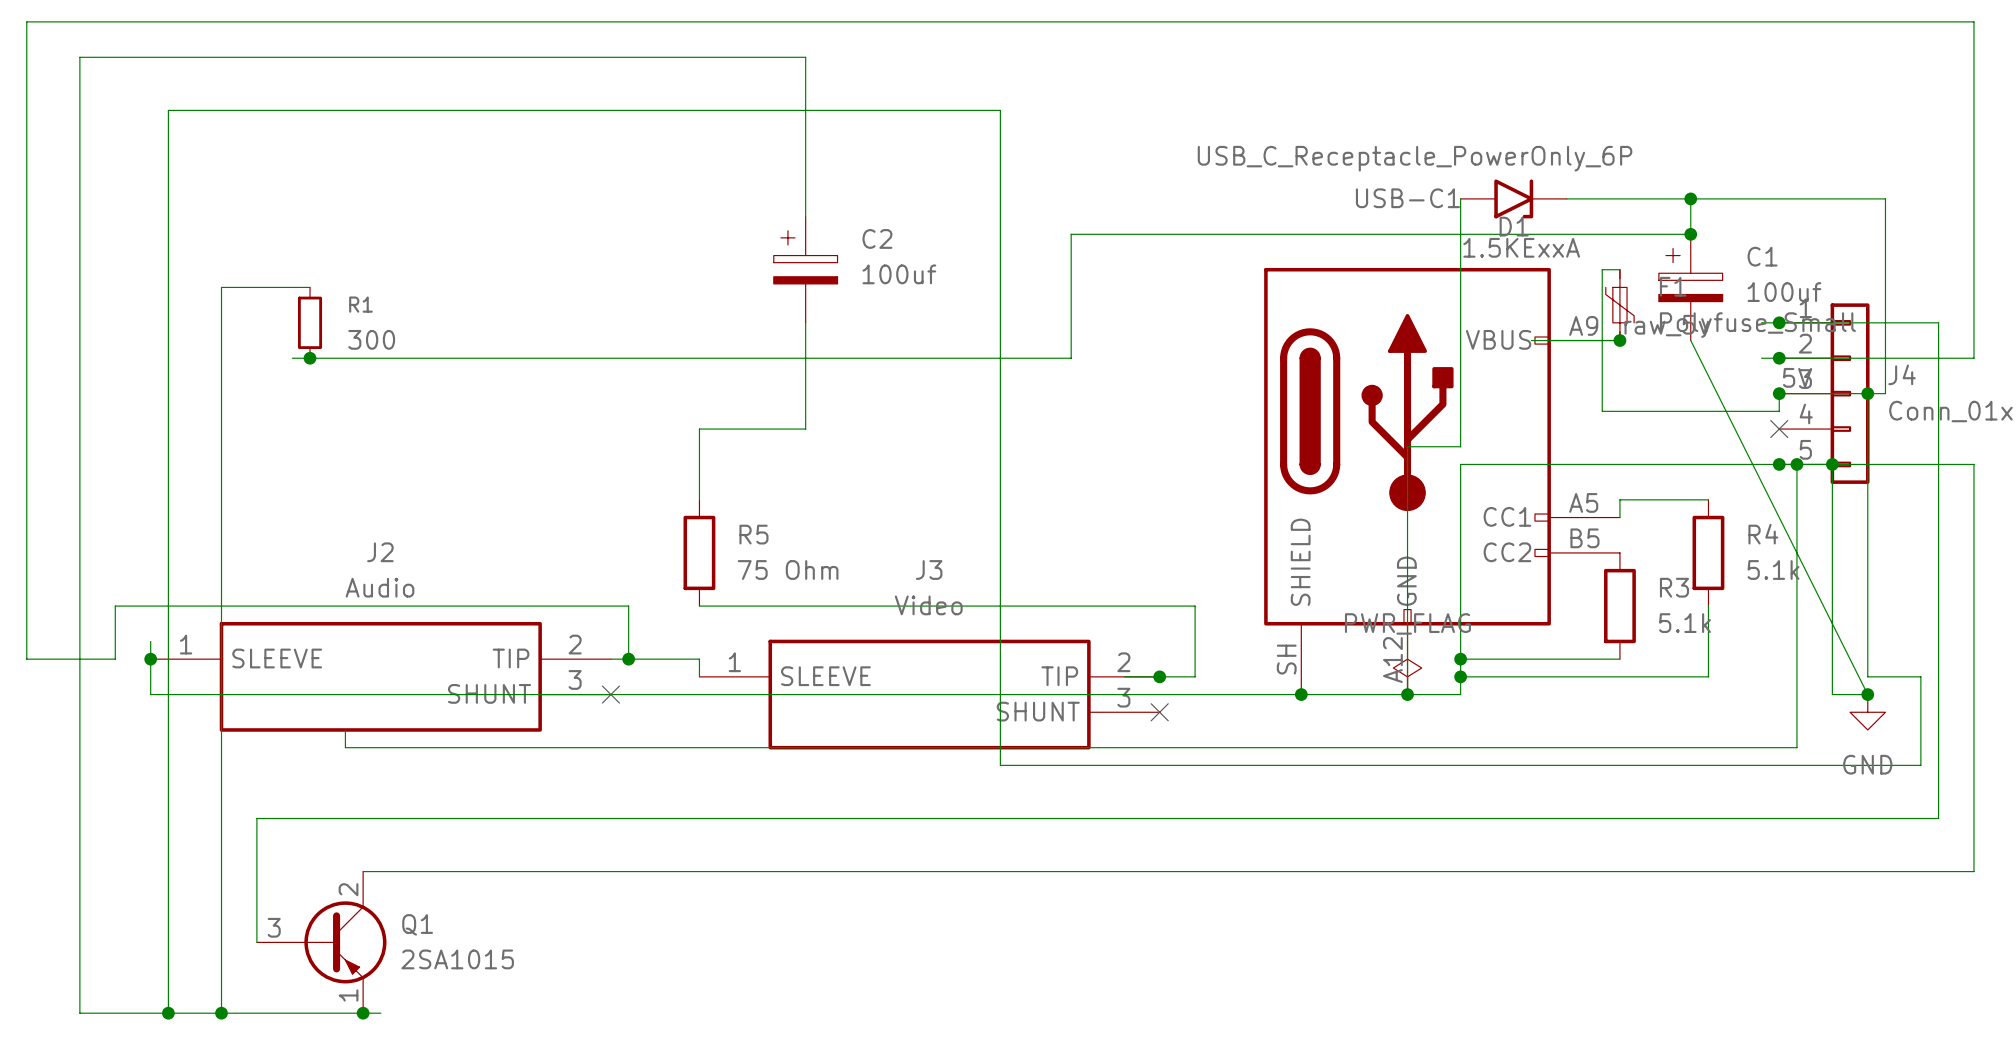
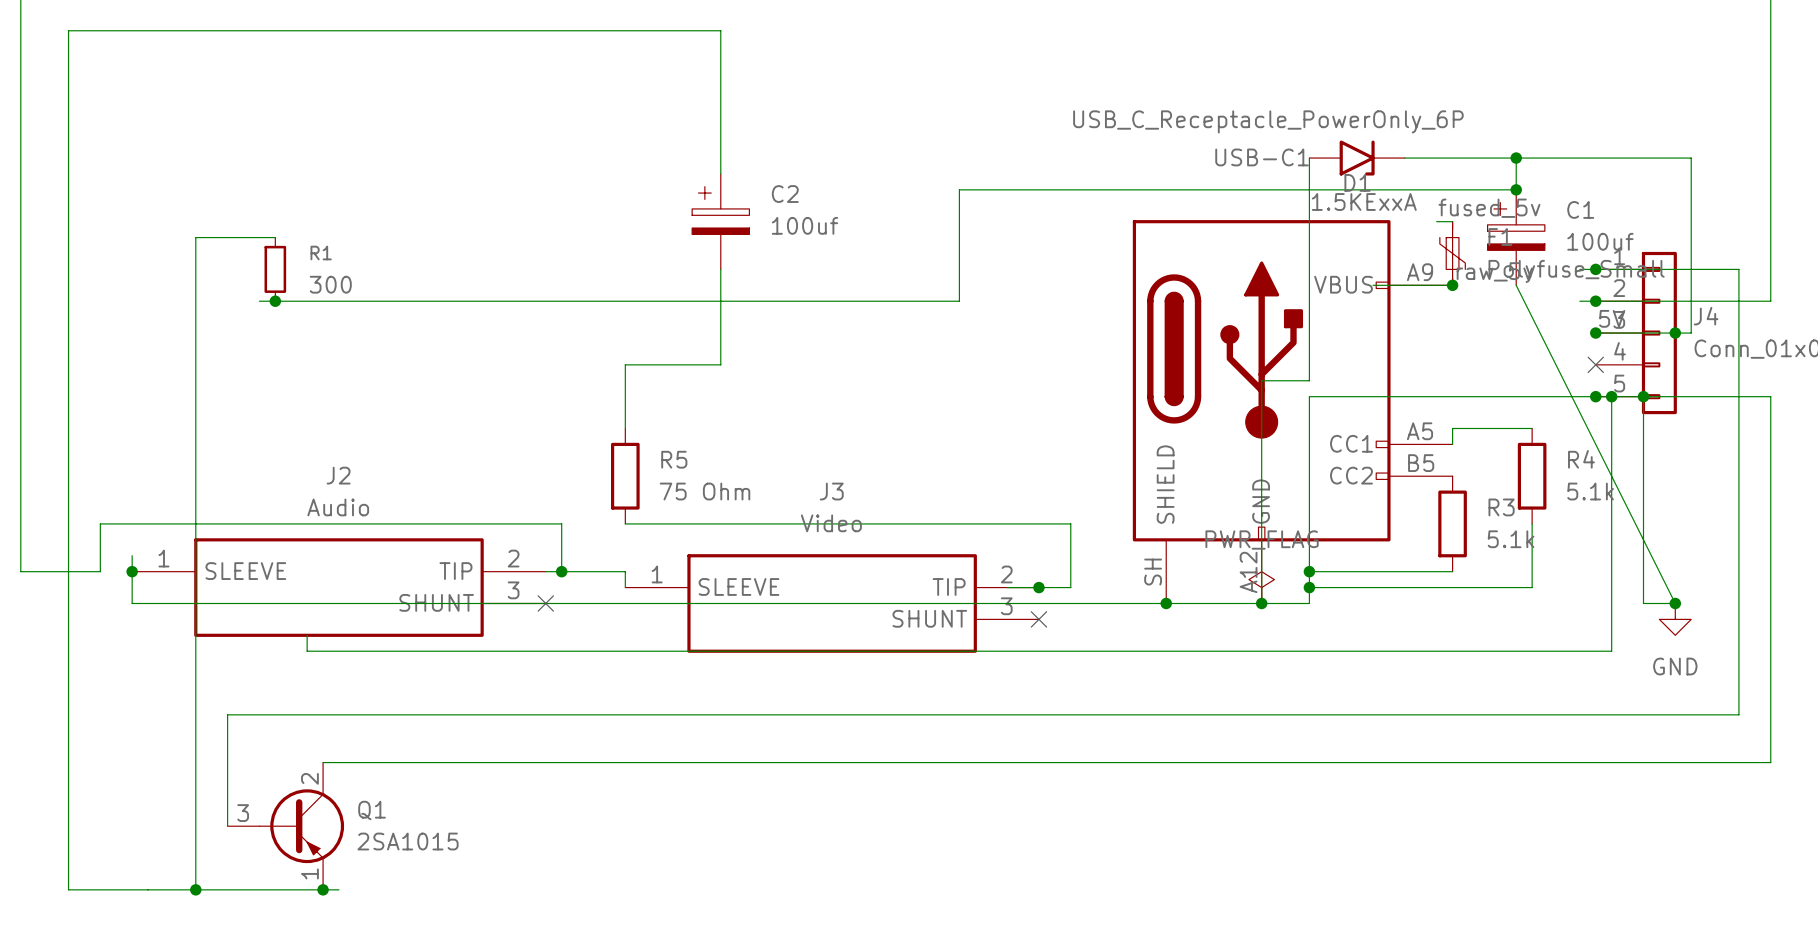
label: none -> fused_5v (1489, 208)
wire: (1602, 269) (1602, 411) (1779, 411) (1779, 393) -> none
wire: (1867, 393) (1867, 676) (1920, 676) (1920, 765) (1000, 765) (1000, 110) (168, 110) (168, 1013) -> none
junction: (168, 1013) -> none

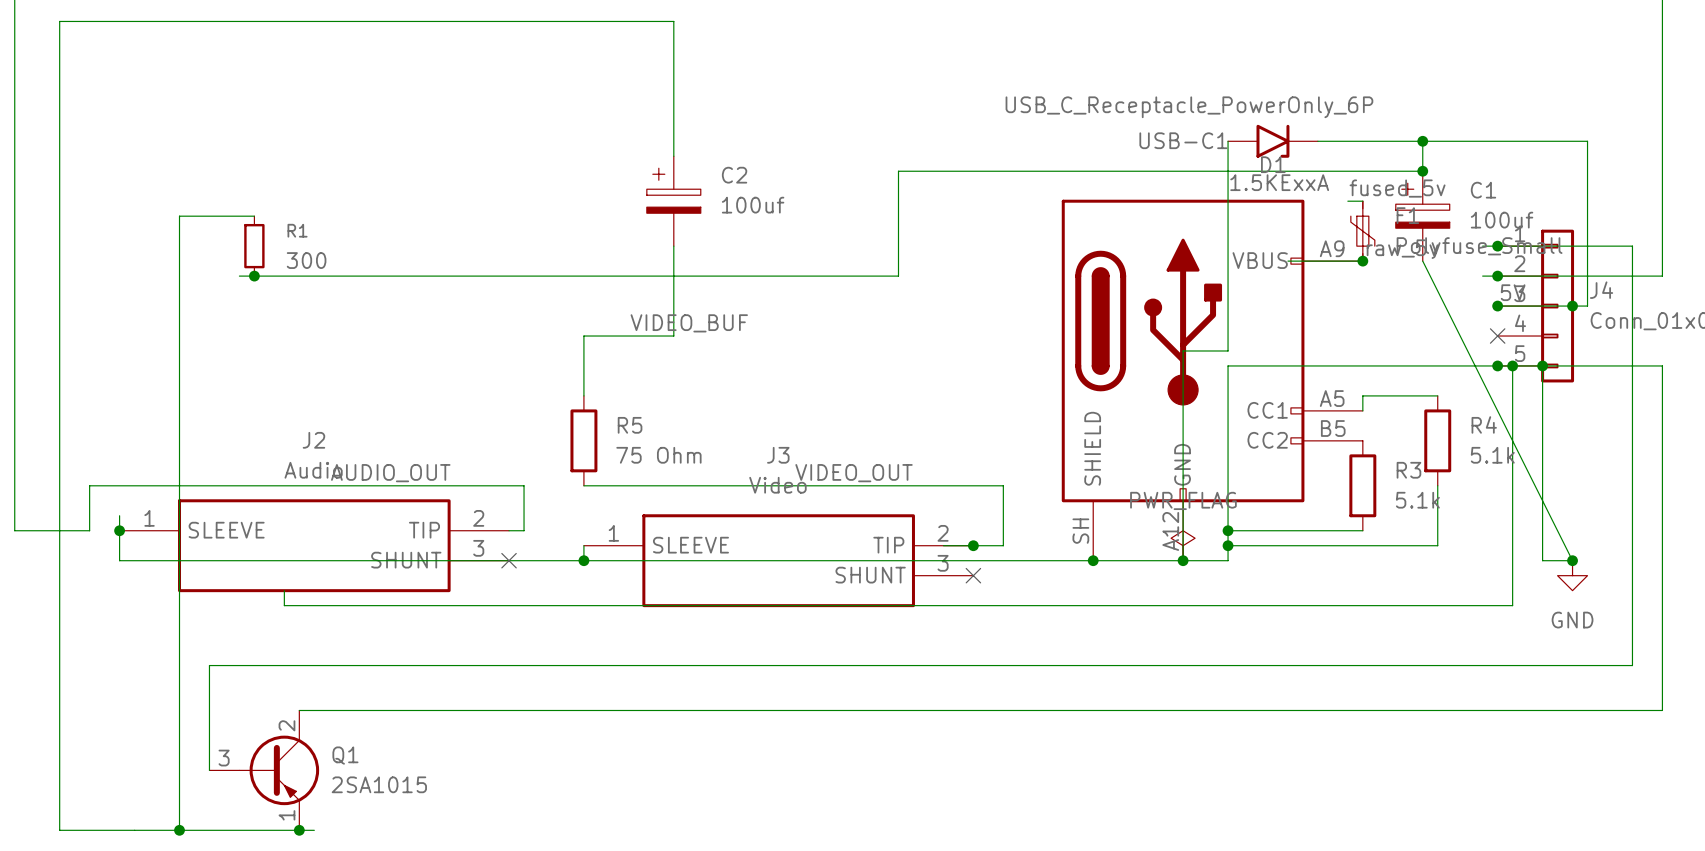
label: none -> VIDEO_BUF (689, 323)
label: none -> AUDIO_OUT (390, 473)
label: none -> VIDEO_OUT (854, 473)
wire: (561, 571) (625, 571) (625, 587) -> (583, 560) (583, 545)
junction position: (561, 571) -> (583, 560)

